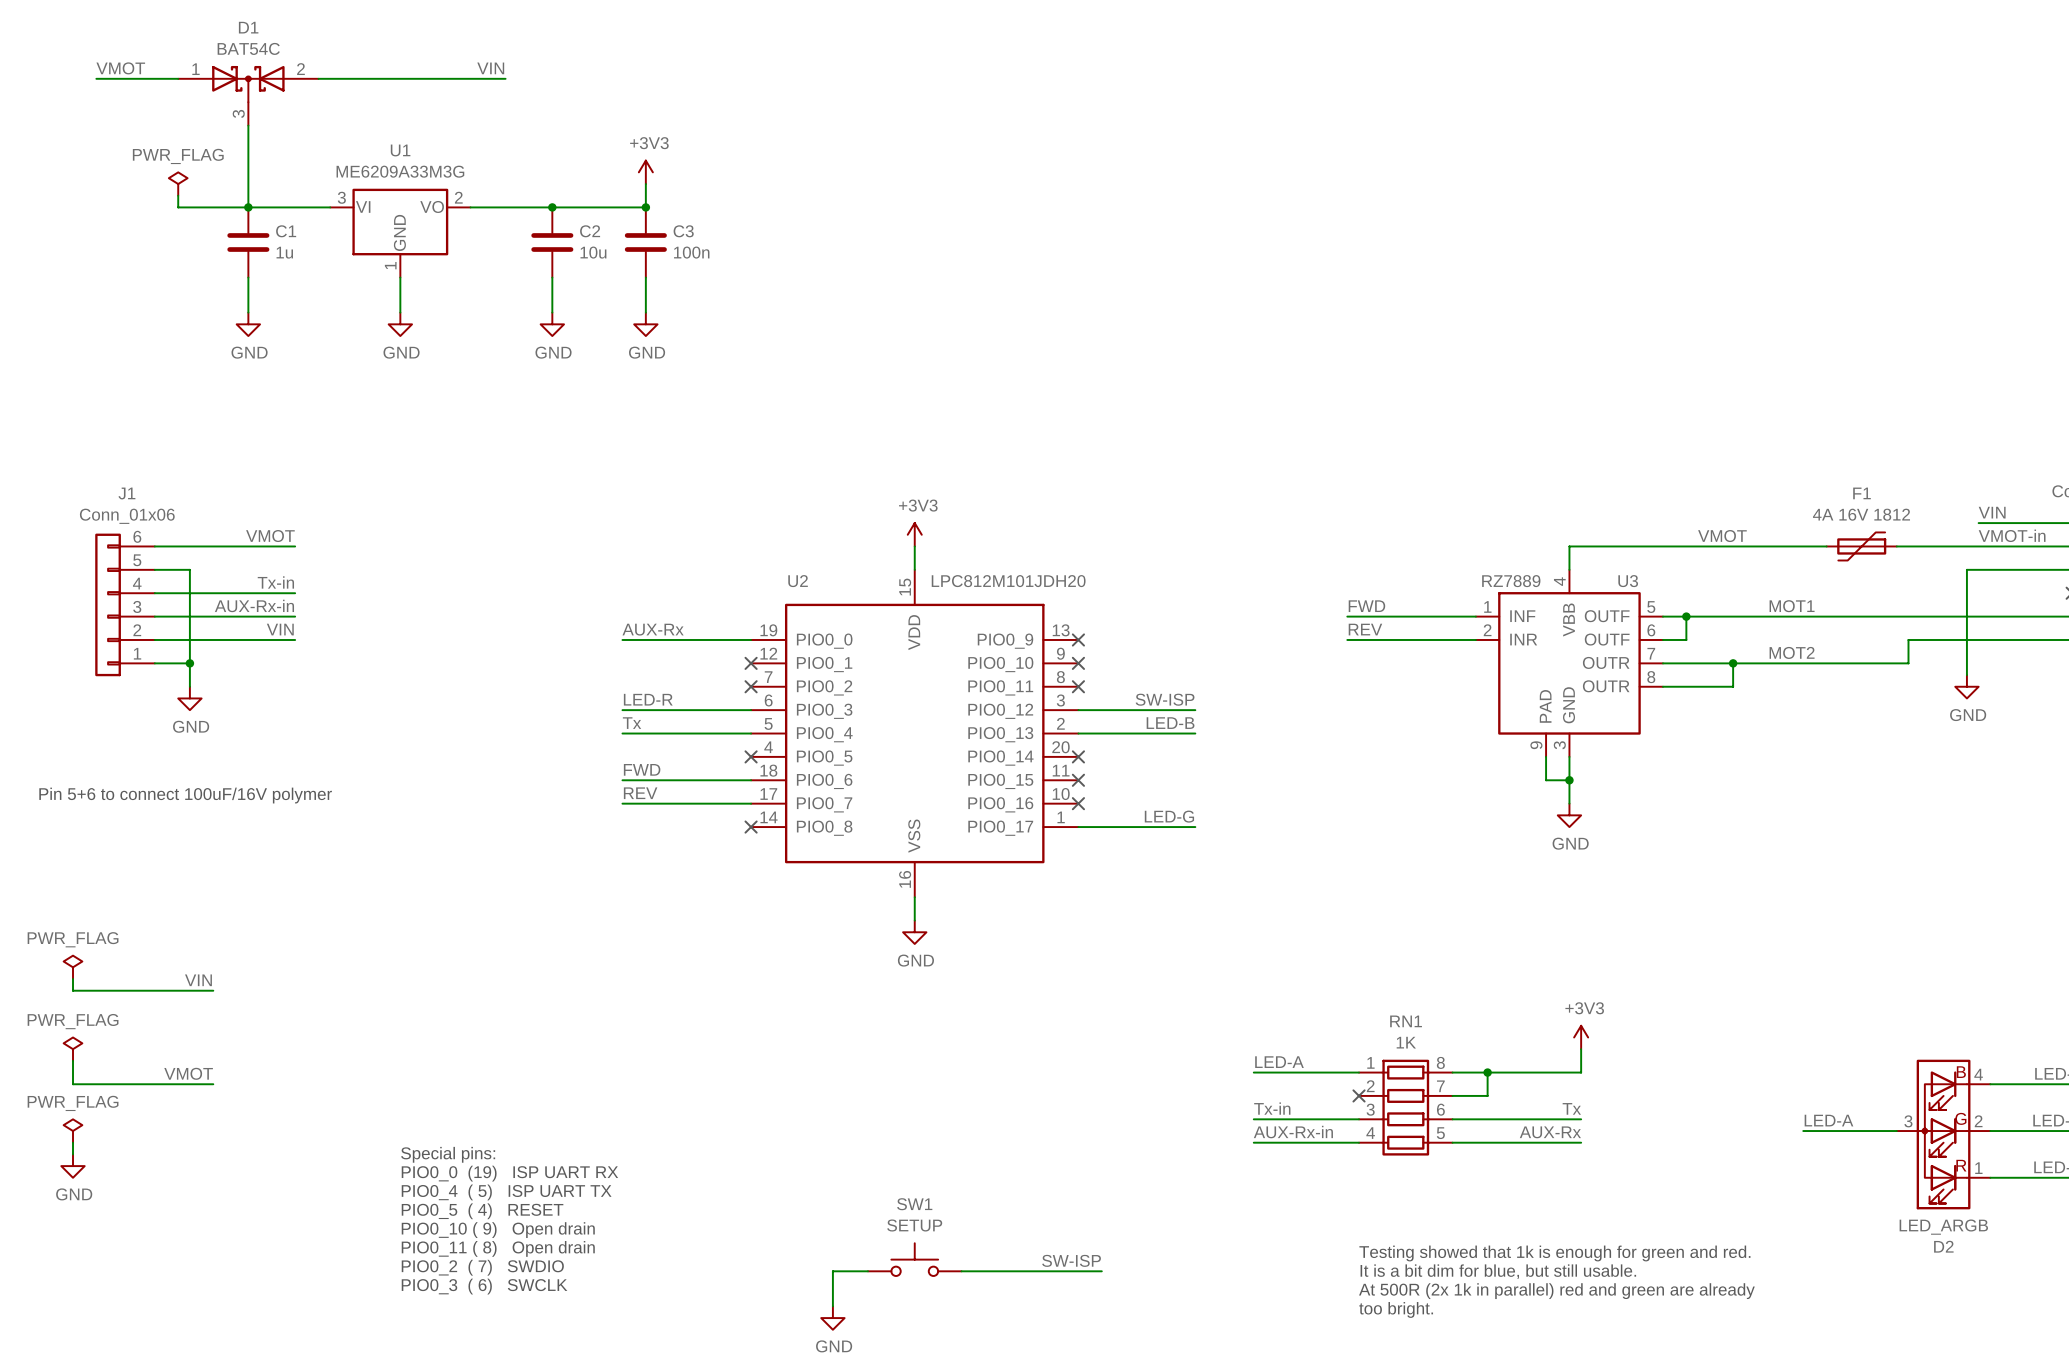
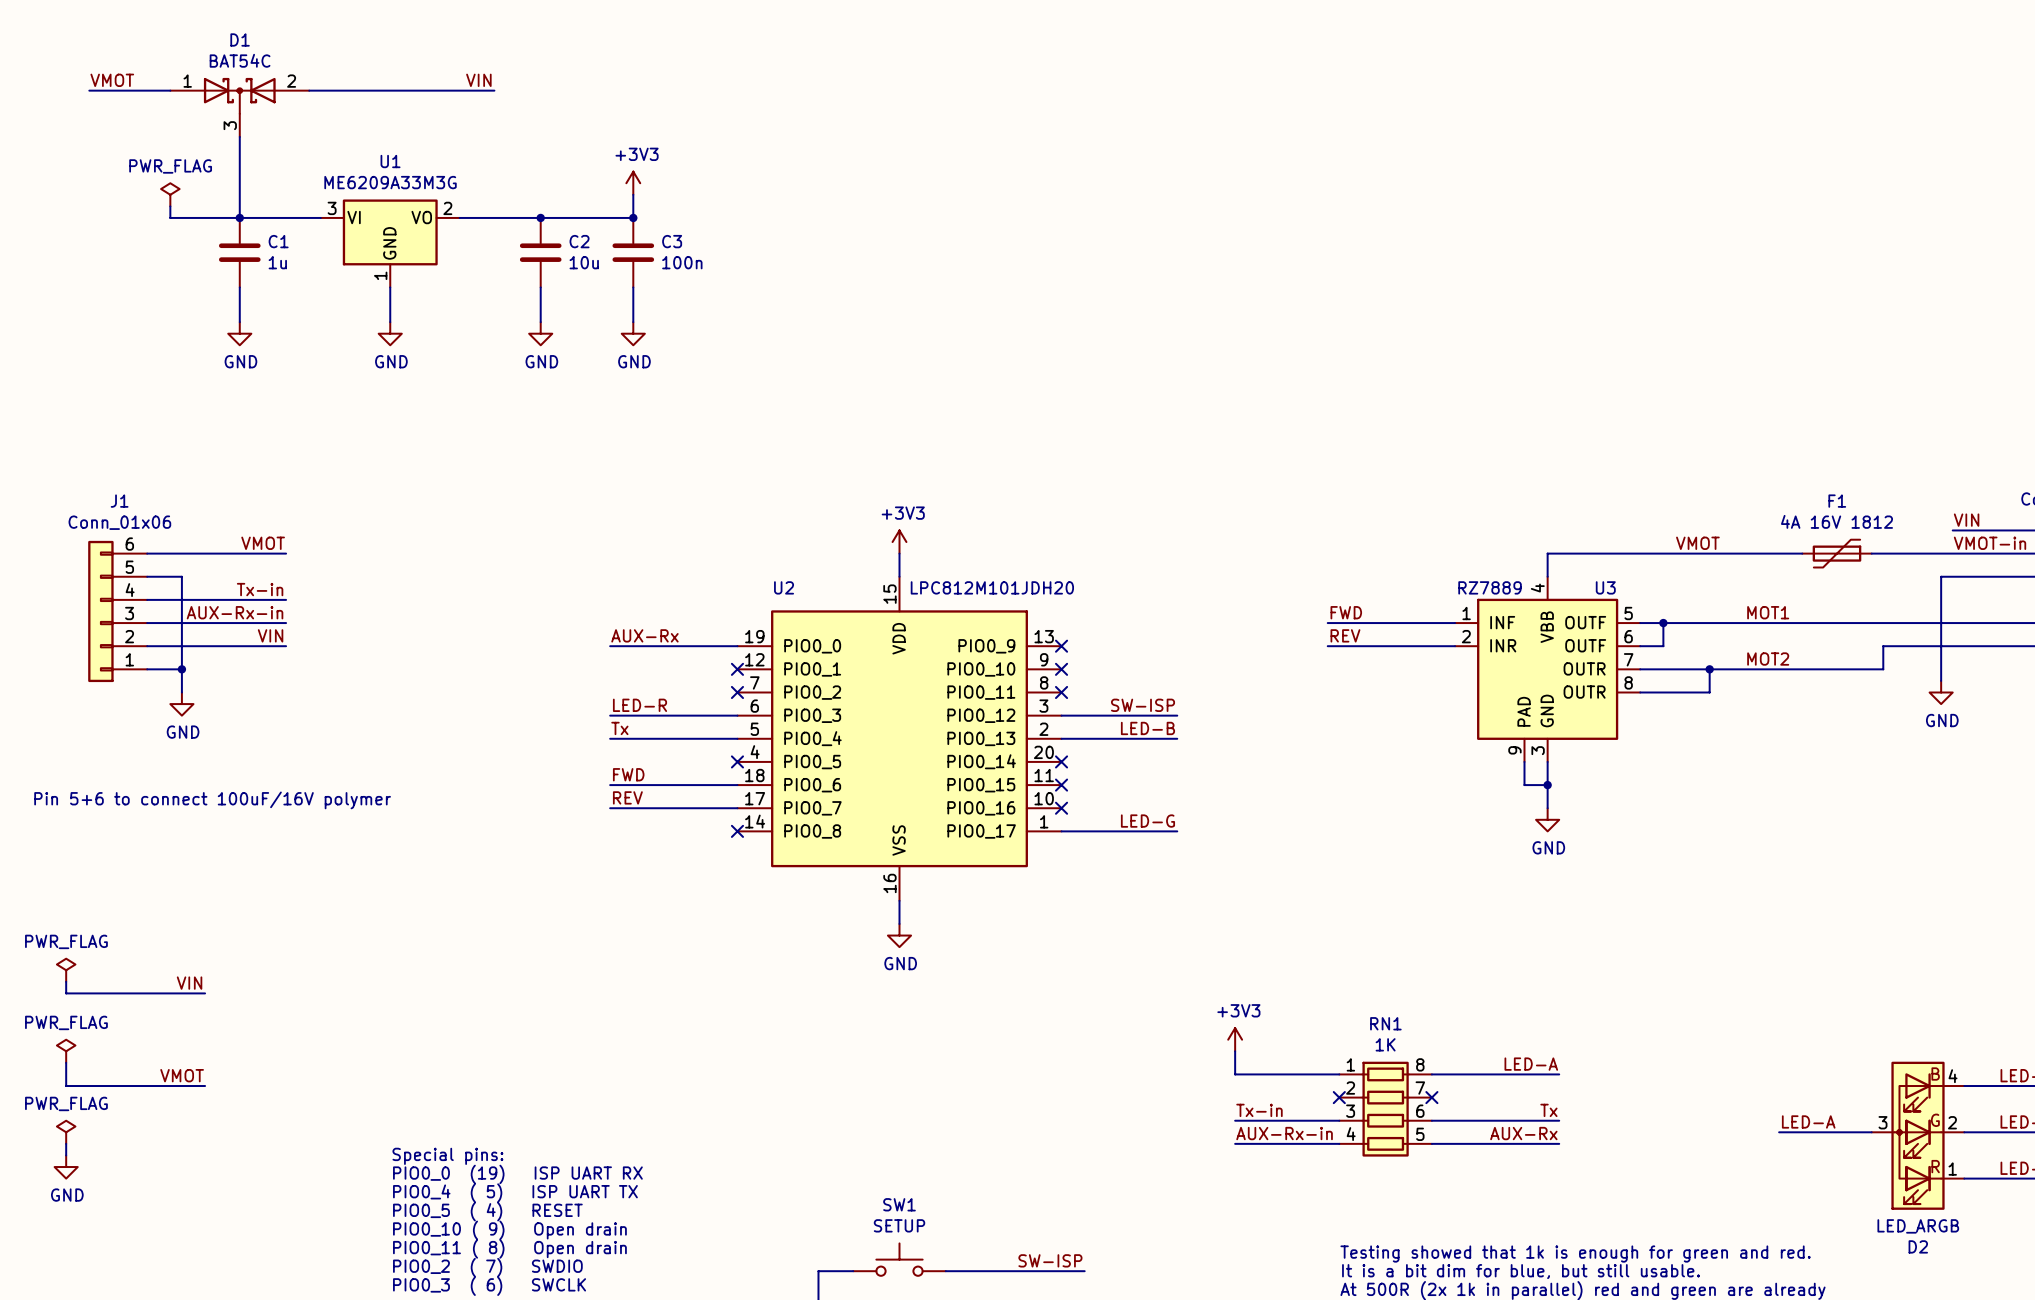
power symbol: none -> +3V3 (1235, 1039)
power symbol: +3V3 (1581, 1037) -> none
wire: none -> (1235, 1051) (1235, 1074)
wire: (1581, 1049) (1581, 1072) -> none
label: LED-A (1279, 1062) -> none
label: none -> LED-A (1531, 1064)
wire: (1487, 1072) (1487, 1095) (1452, 1095) -> none
junction: (1487, 1072) -> none
no-connect mark: none -> (1431, 1097)

